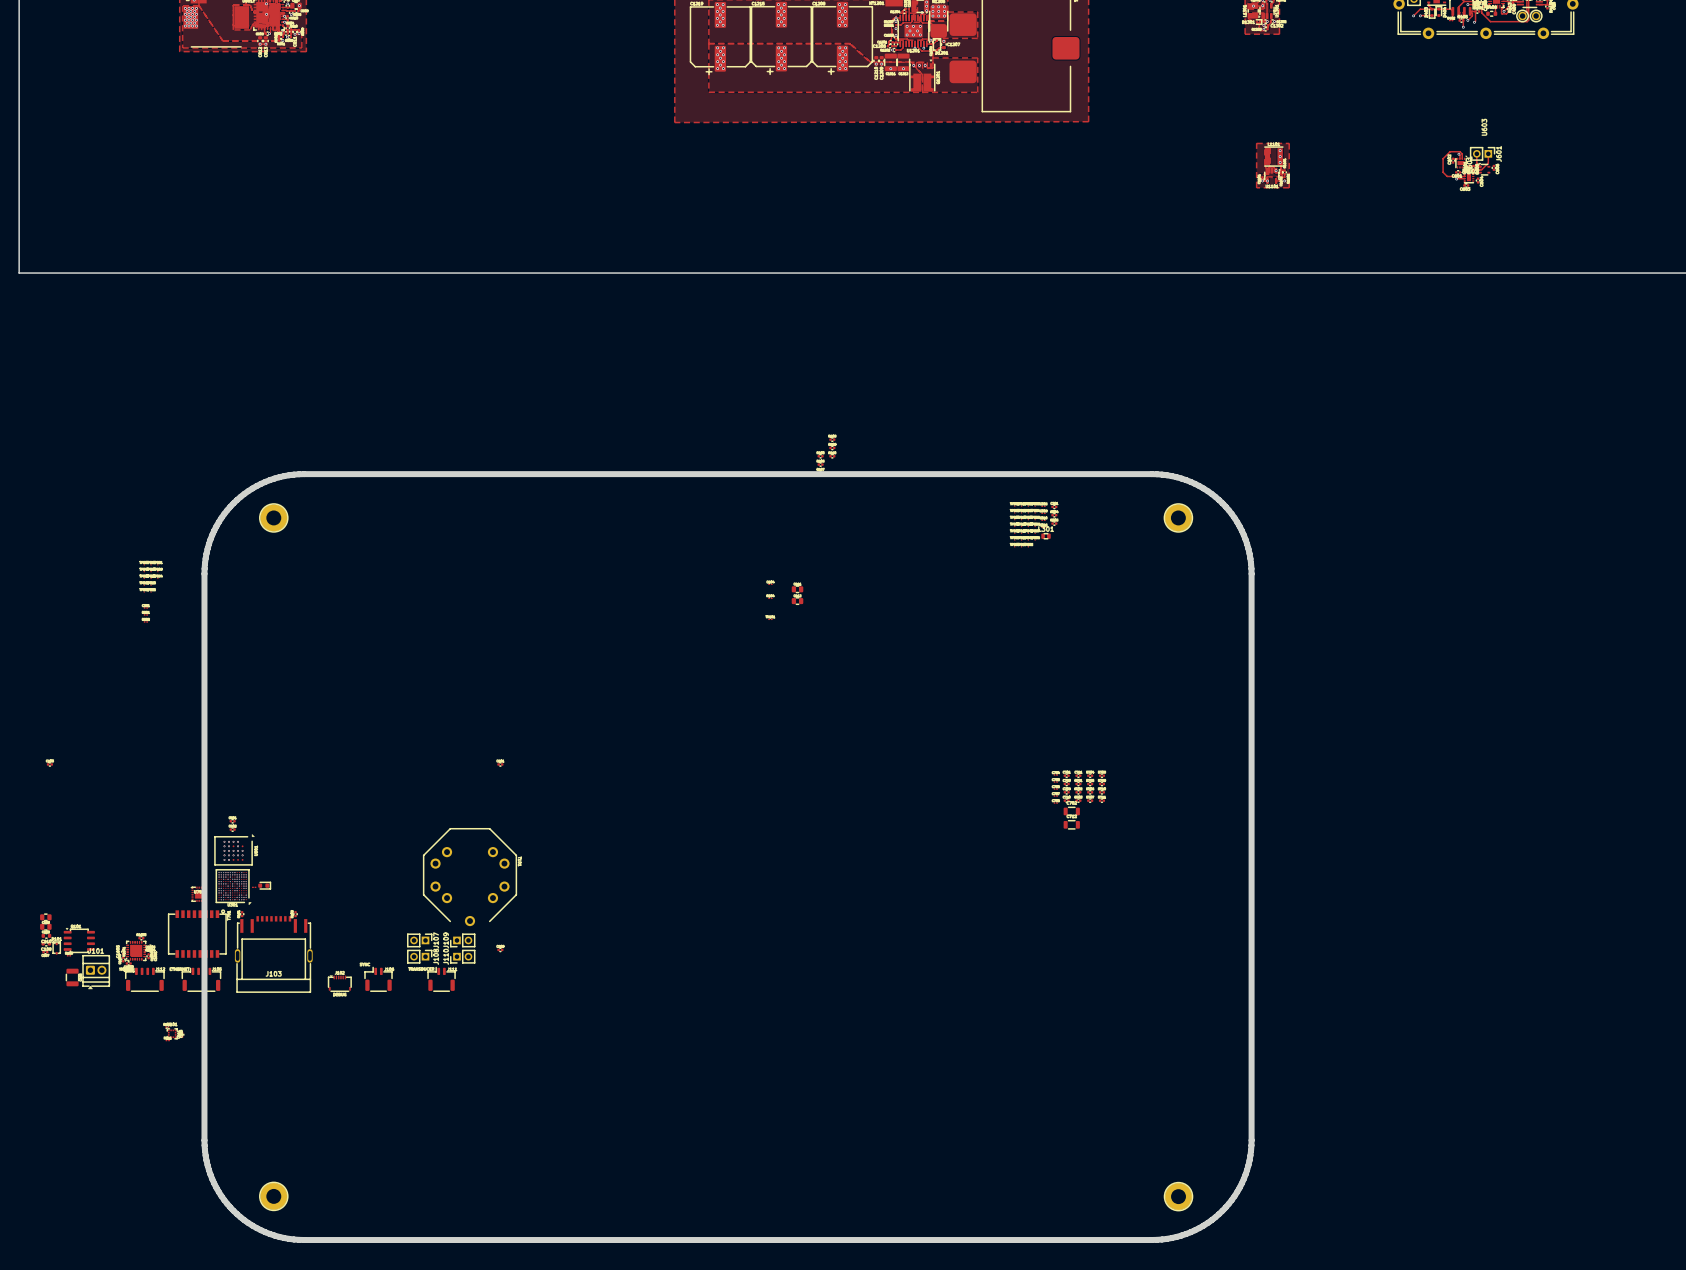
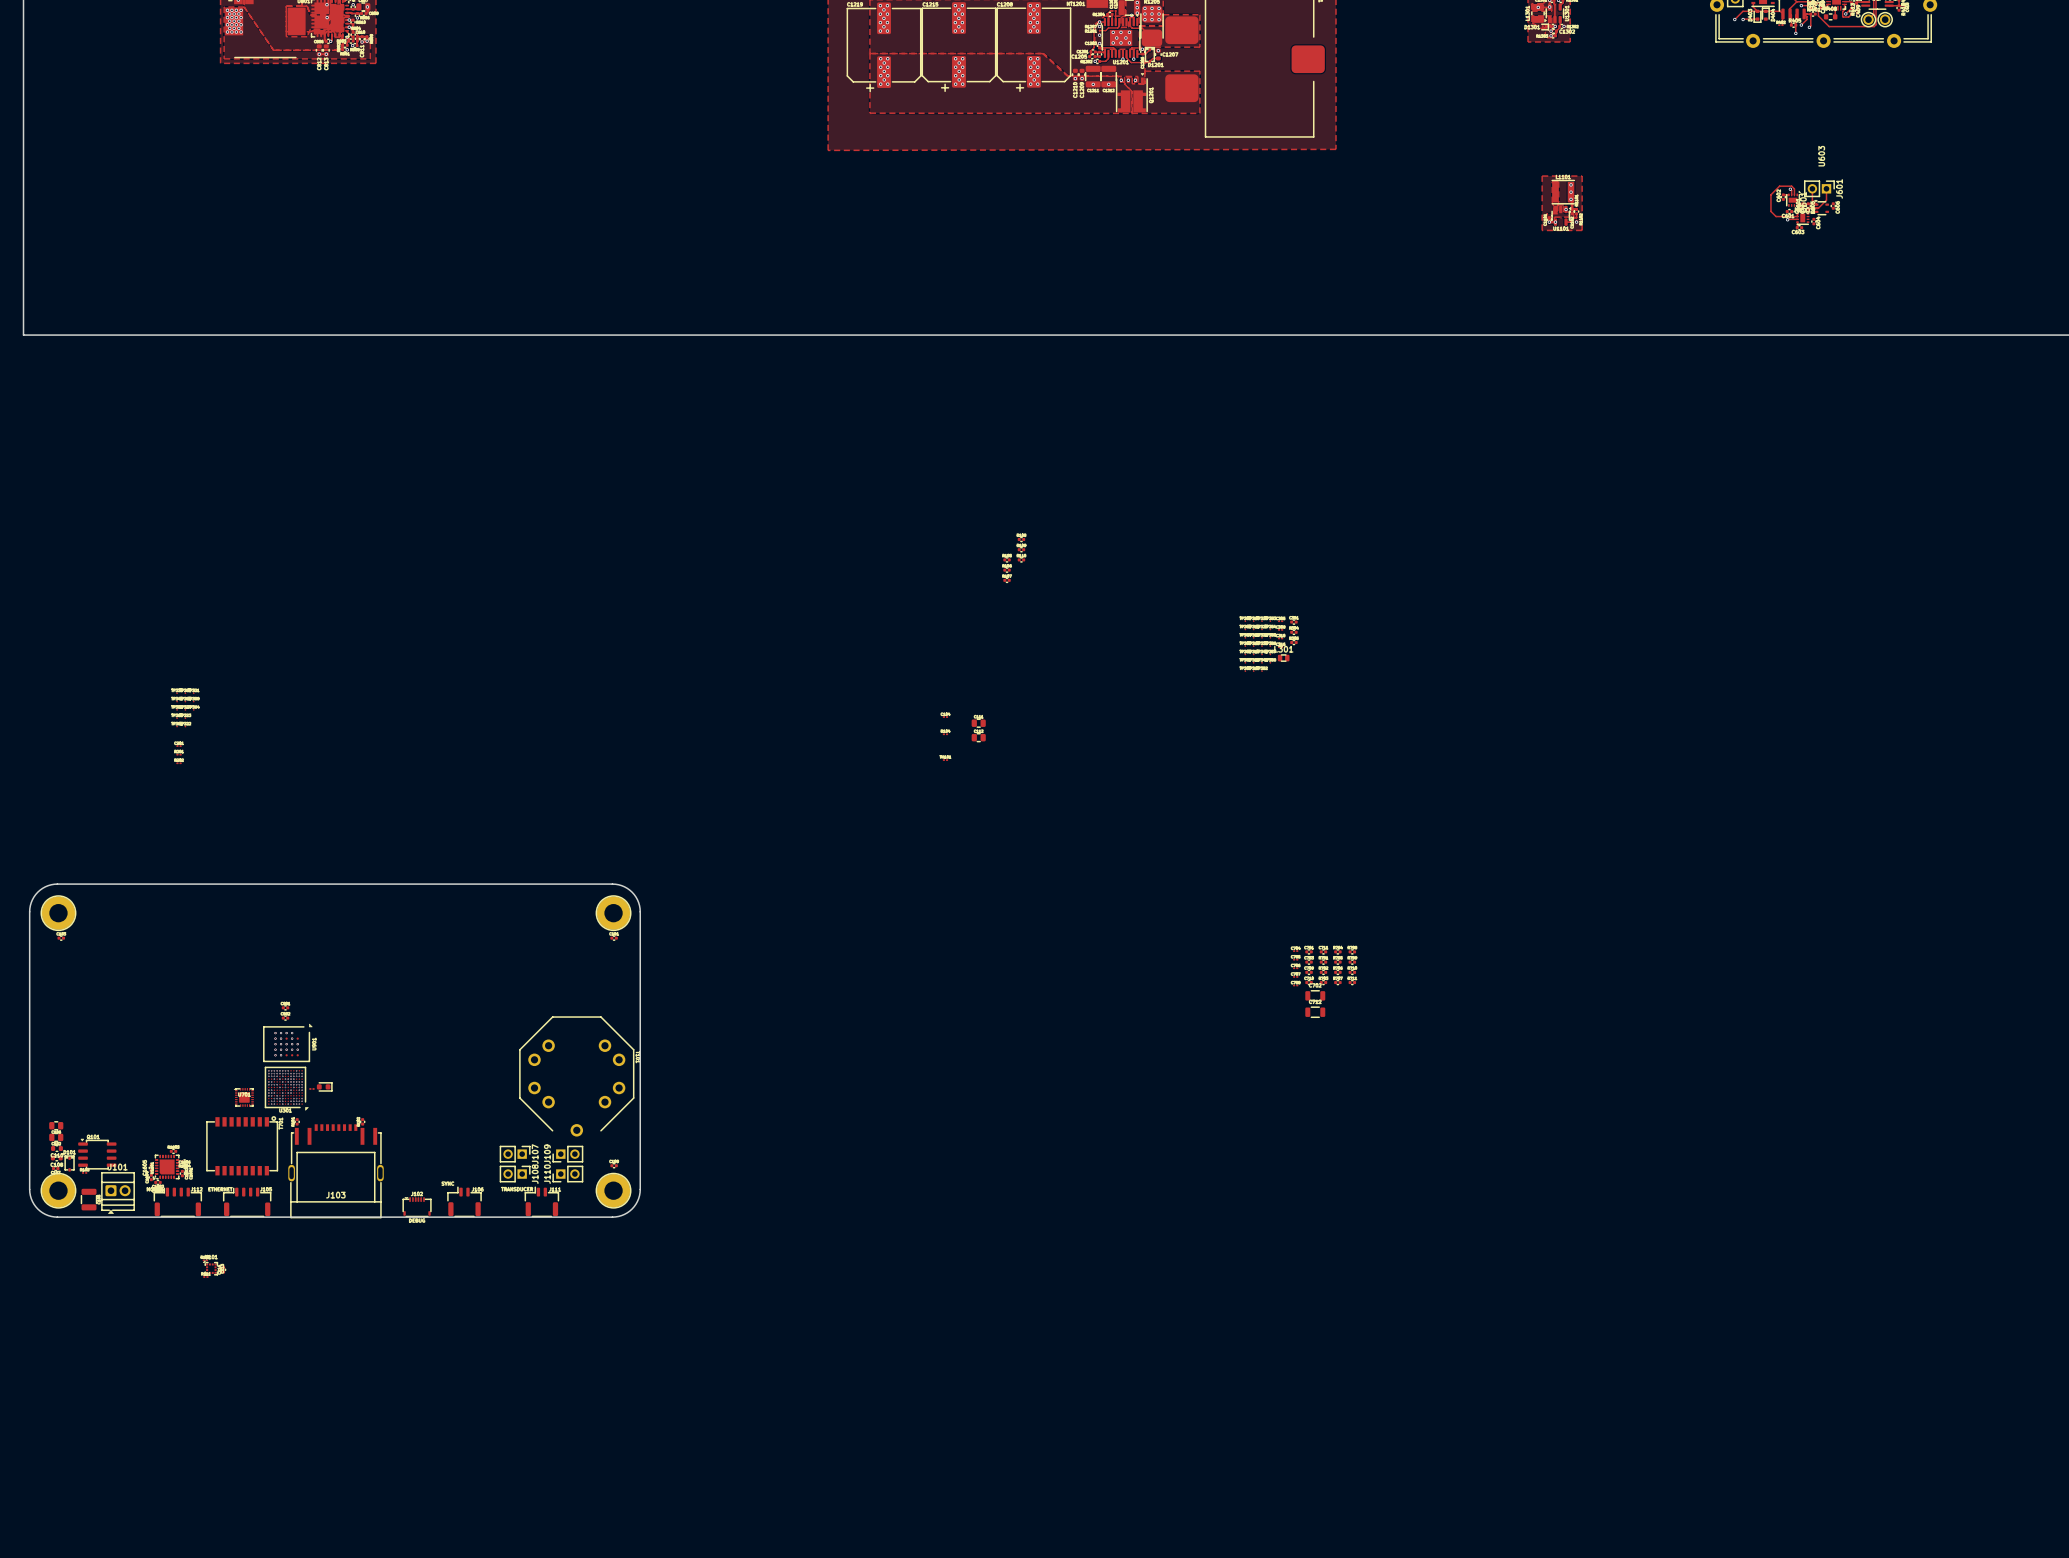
board edge: (304, 474) (288, 475) (269, 480) (252, 488) (237, 499) (224, 514) (214, 530) (204, 563) (204, 1145) (207, 1165) (214, 1183) (224, 1200) (240, 1217) (269, 1233) (288, 1238) (304, 1240) (1151, 1240) (1172, 1237) (1195, 1230) (1211, 1220) (1228, 1203) (1245, 1174) (1251, 1145) (1251, 573) (1249, 553) (1241, 530) (1231, 514) (1215, 496) (1186, 480) (1167, 475) (1151, 474) (304, 474) -> none
part: (273, 517) -> none
part: (1178, 517) -> none
board edge: none -> (640, 911) (637, 899) (632, 892) (621, 885) (612, 884) (57, 884) (45, 886) (33, 897) (29, 911) (29, 1189) (32, 1201) (42, 1212) (57, 1217) (612, 1217) (624, 1214) (635, 1204) (640, 1189) (640, 911)
part: none -> (58, 913)
part: none -> (613, 913)
part: none -> (58, 1190)
part: none -> (613, 1190)
part: (273, 1196) -> none
part: (1178, 1196) -> none

